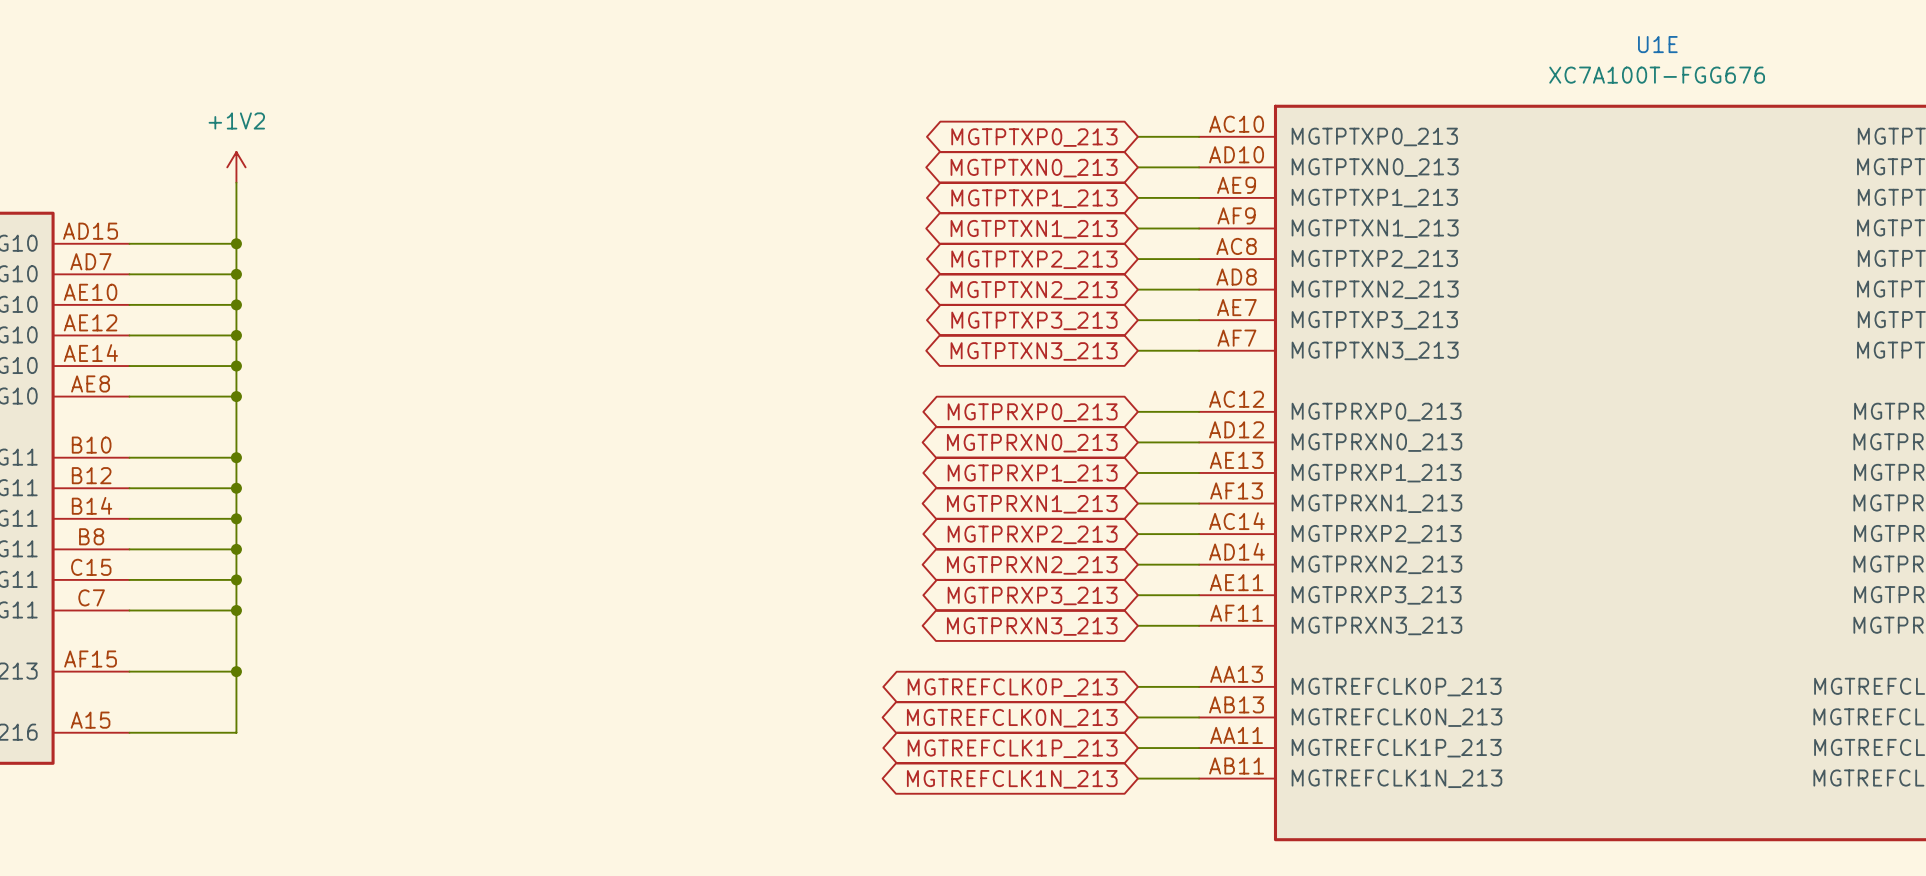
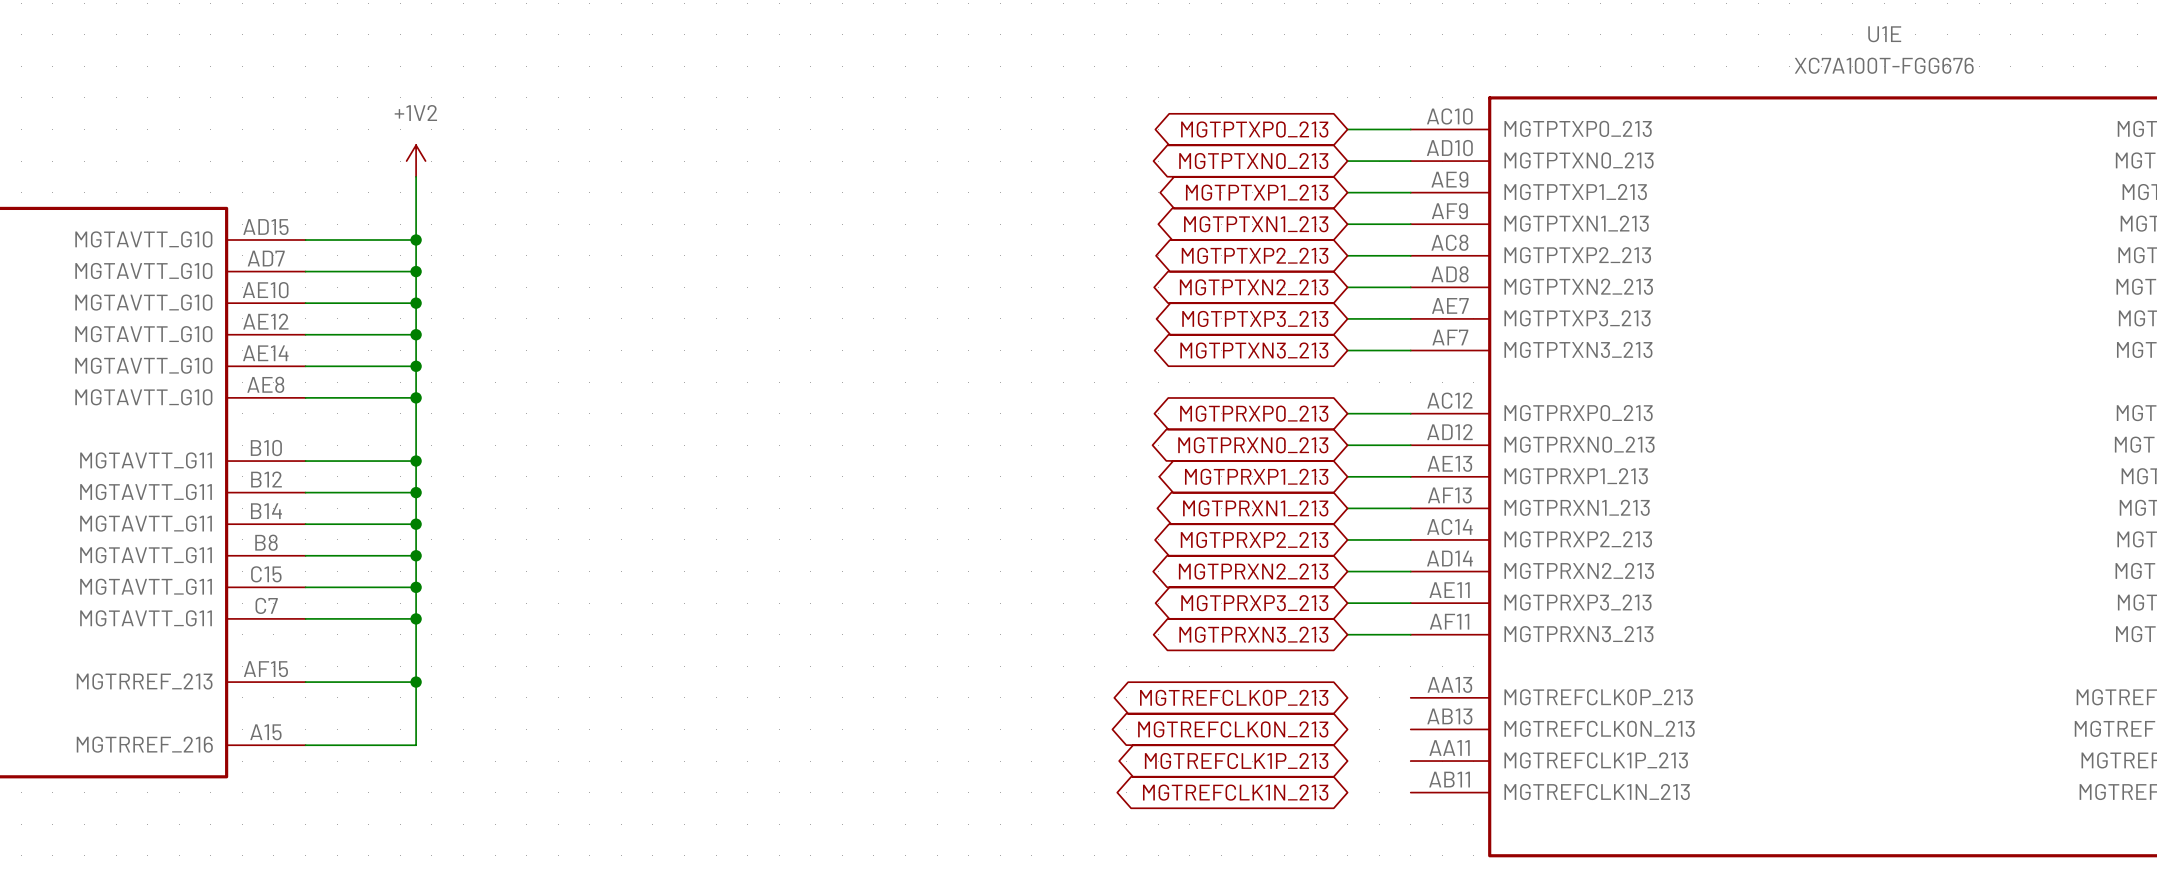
wire: (1137, 686) (1199, 686) -> none
wire: (1137, 717) (1199, 717) -> none
wire: (1137, 748) (1199, 748) -> none
wire: (1137, 778) (1199, 778) -> none

